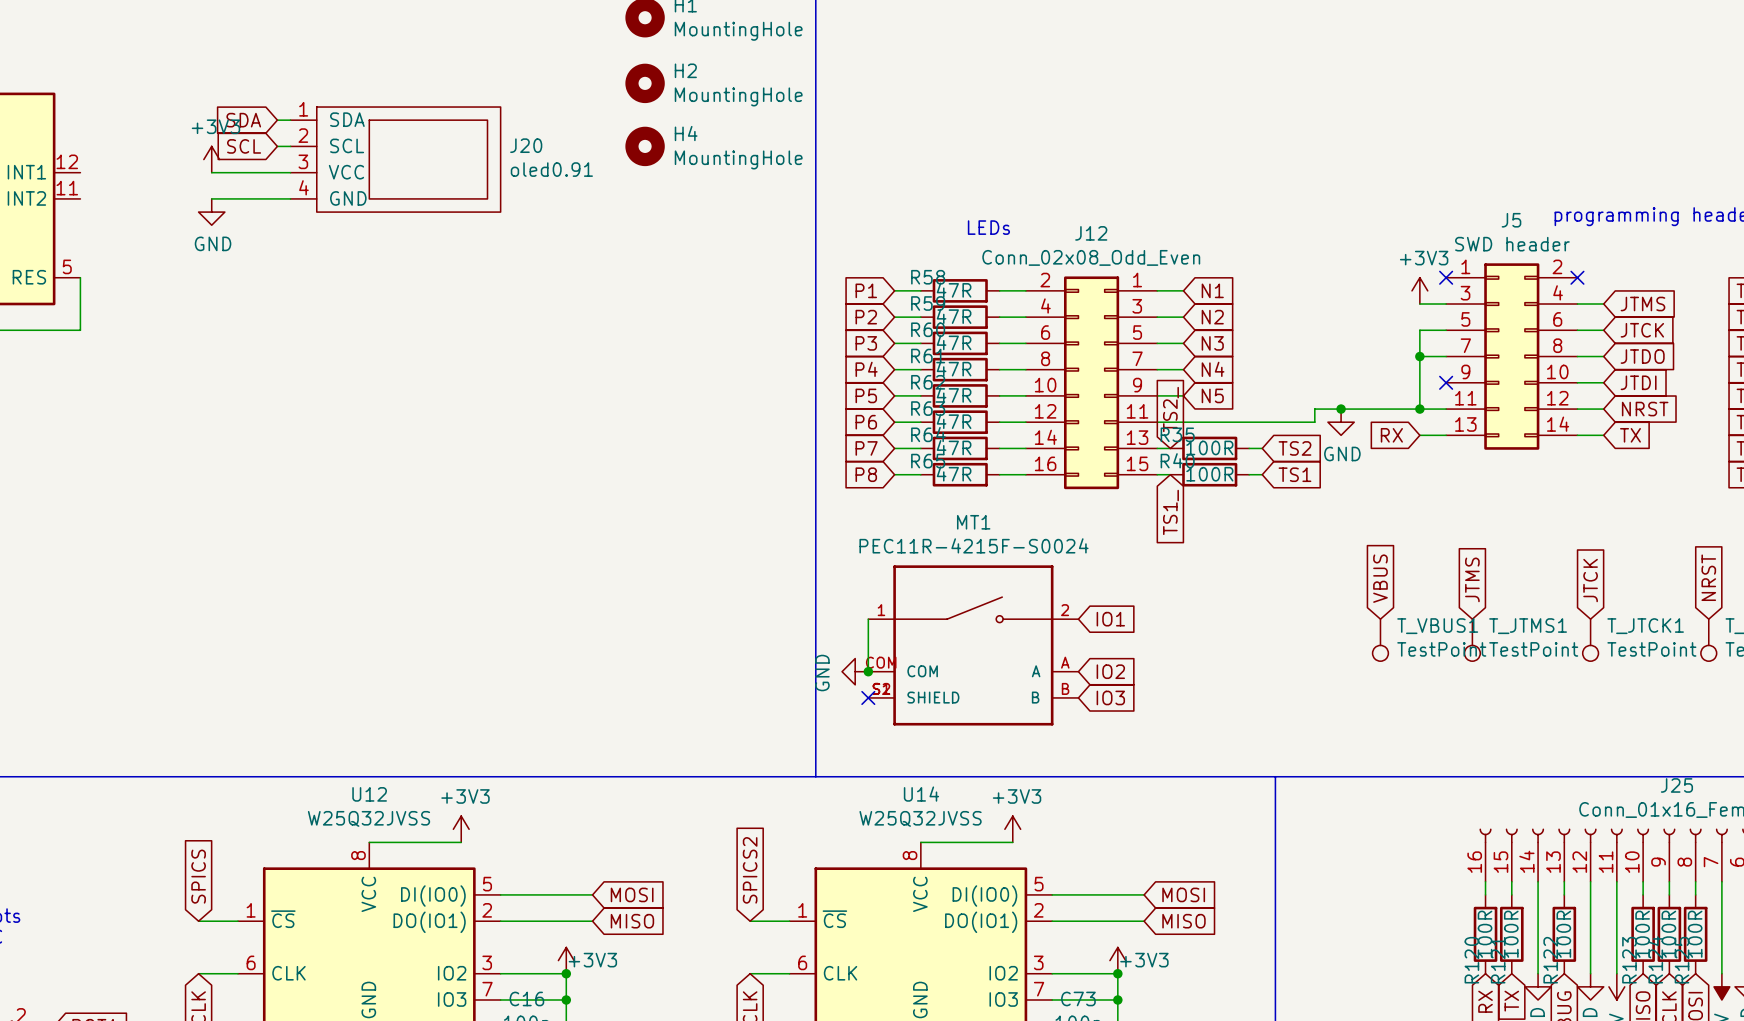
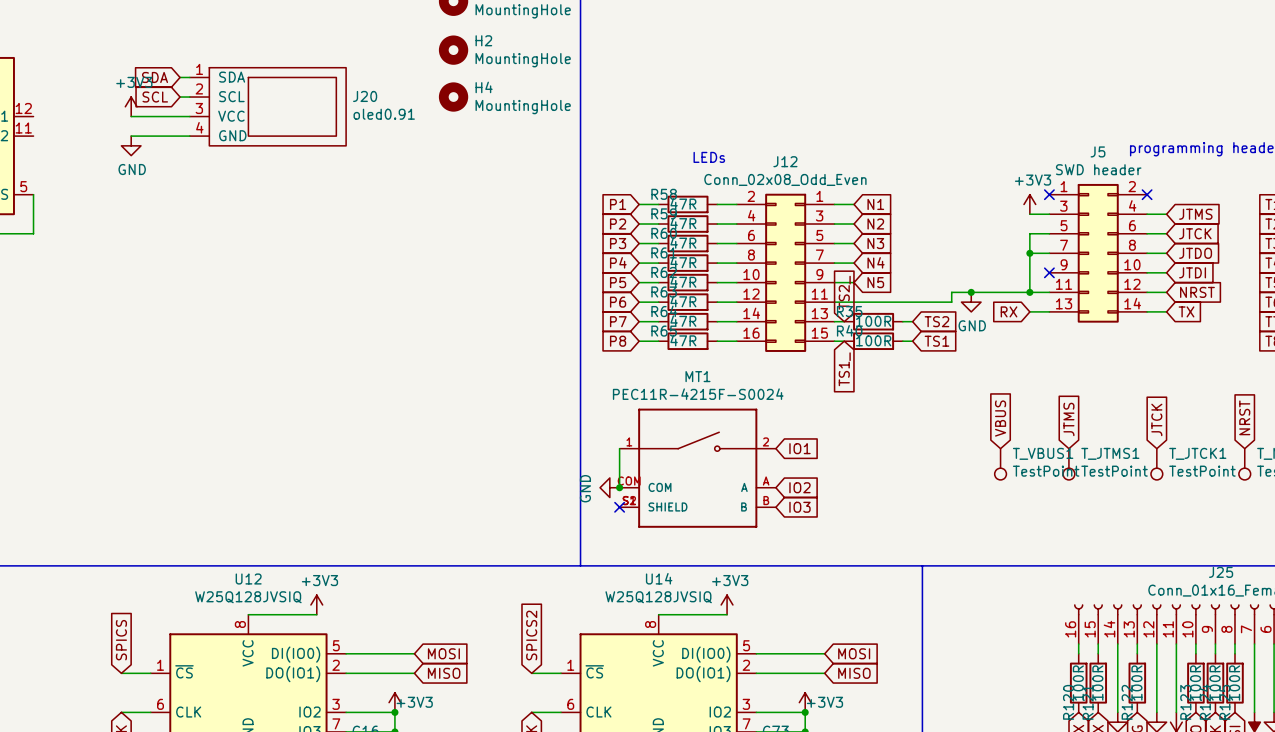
U12 value: W25Q32JVSS (368, 818) -> W25Q128JVSIQ (248, 597)
U14 value: W25Q32JVSS (920, 818) -> W25Q128JVSIQ (658, 597)

